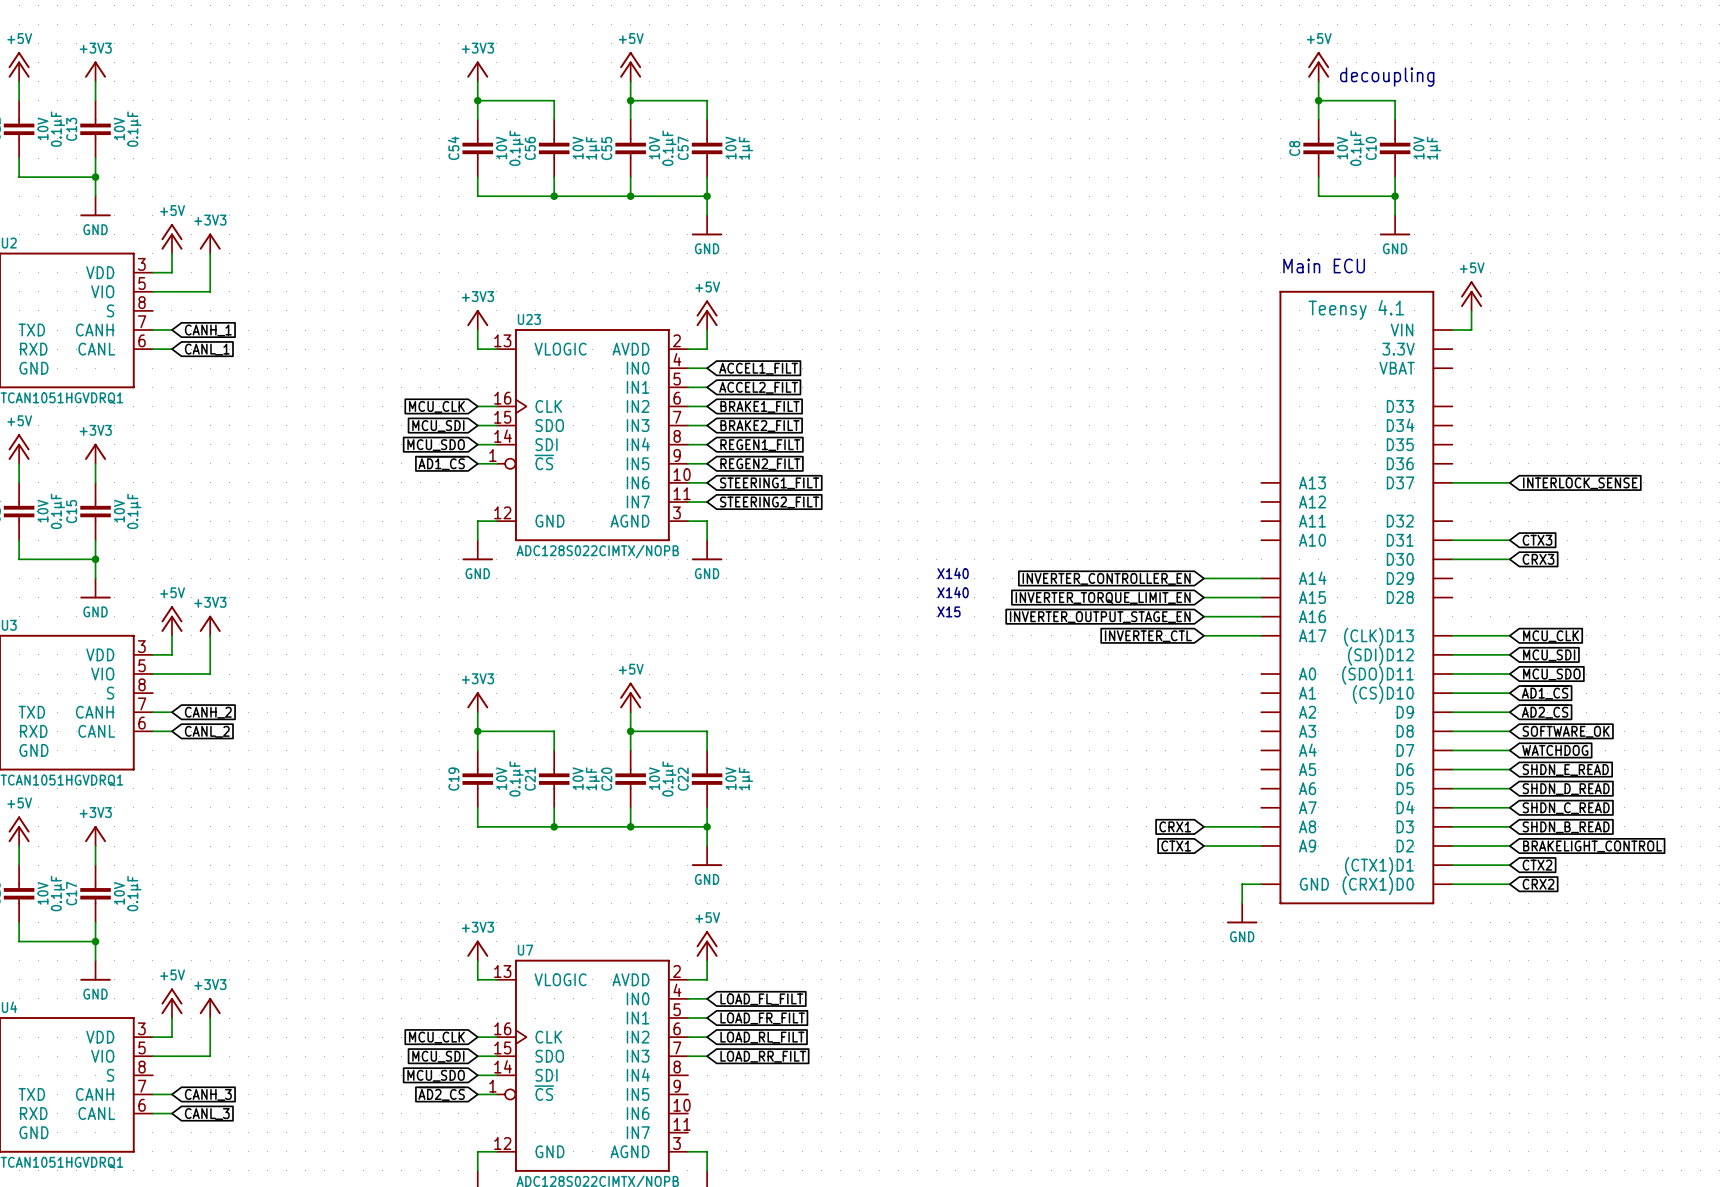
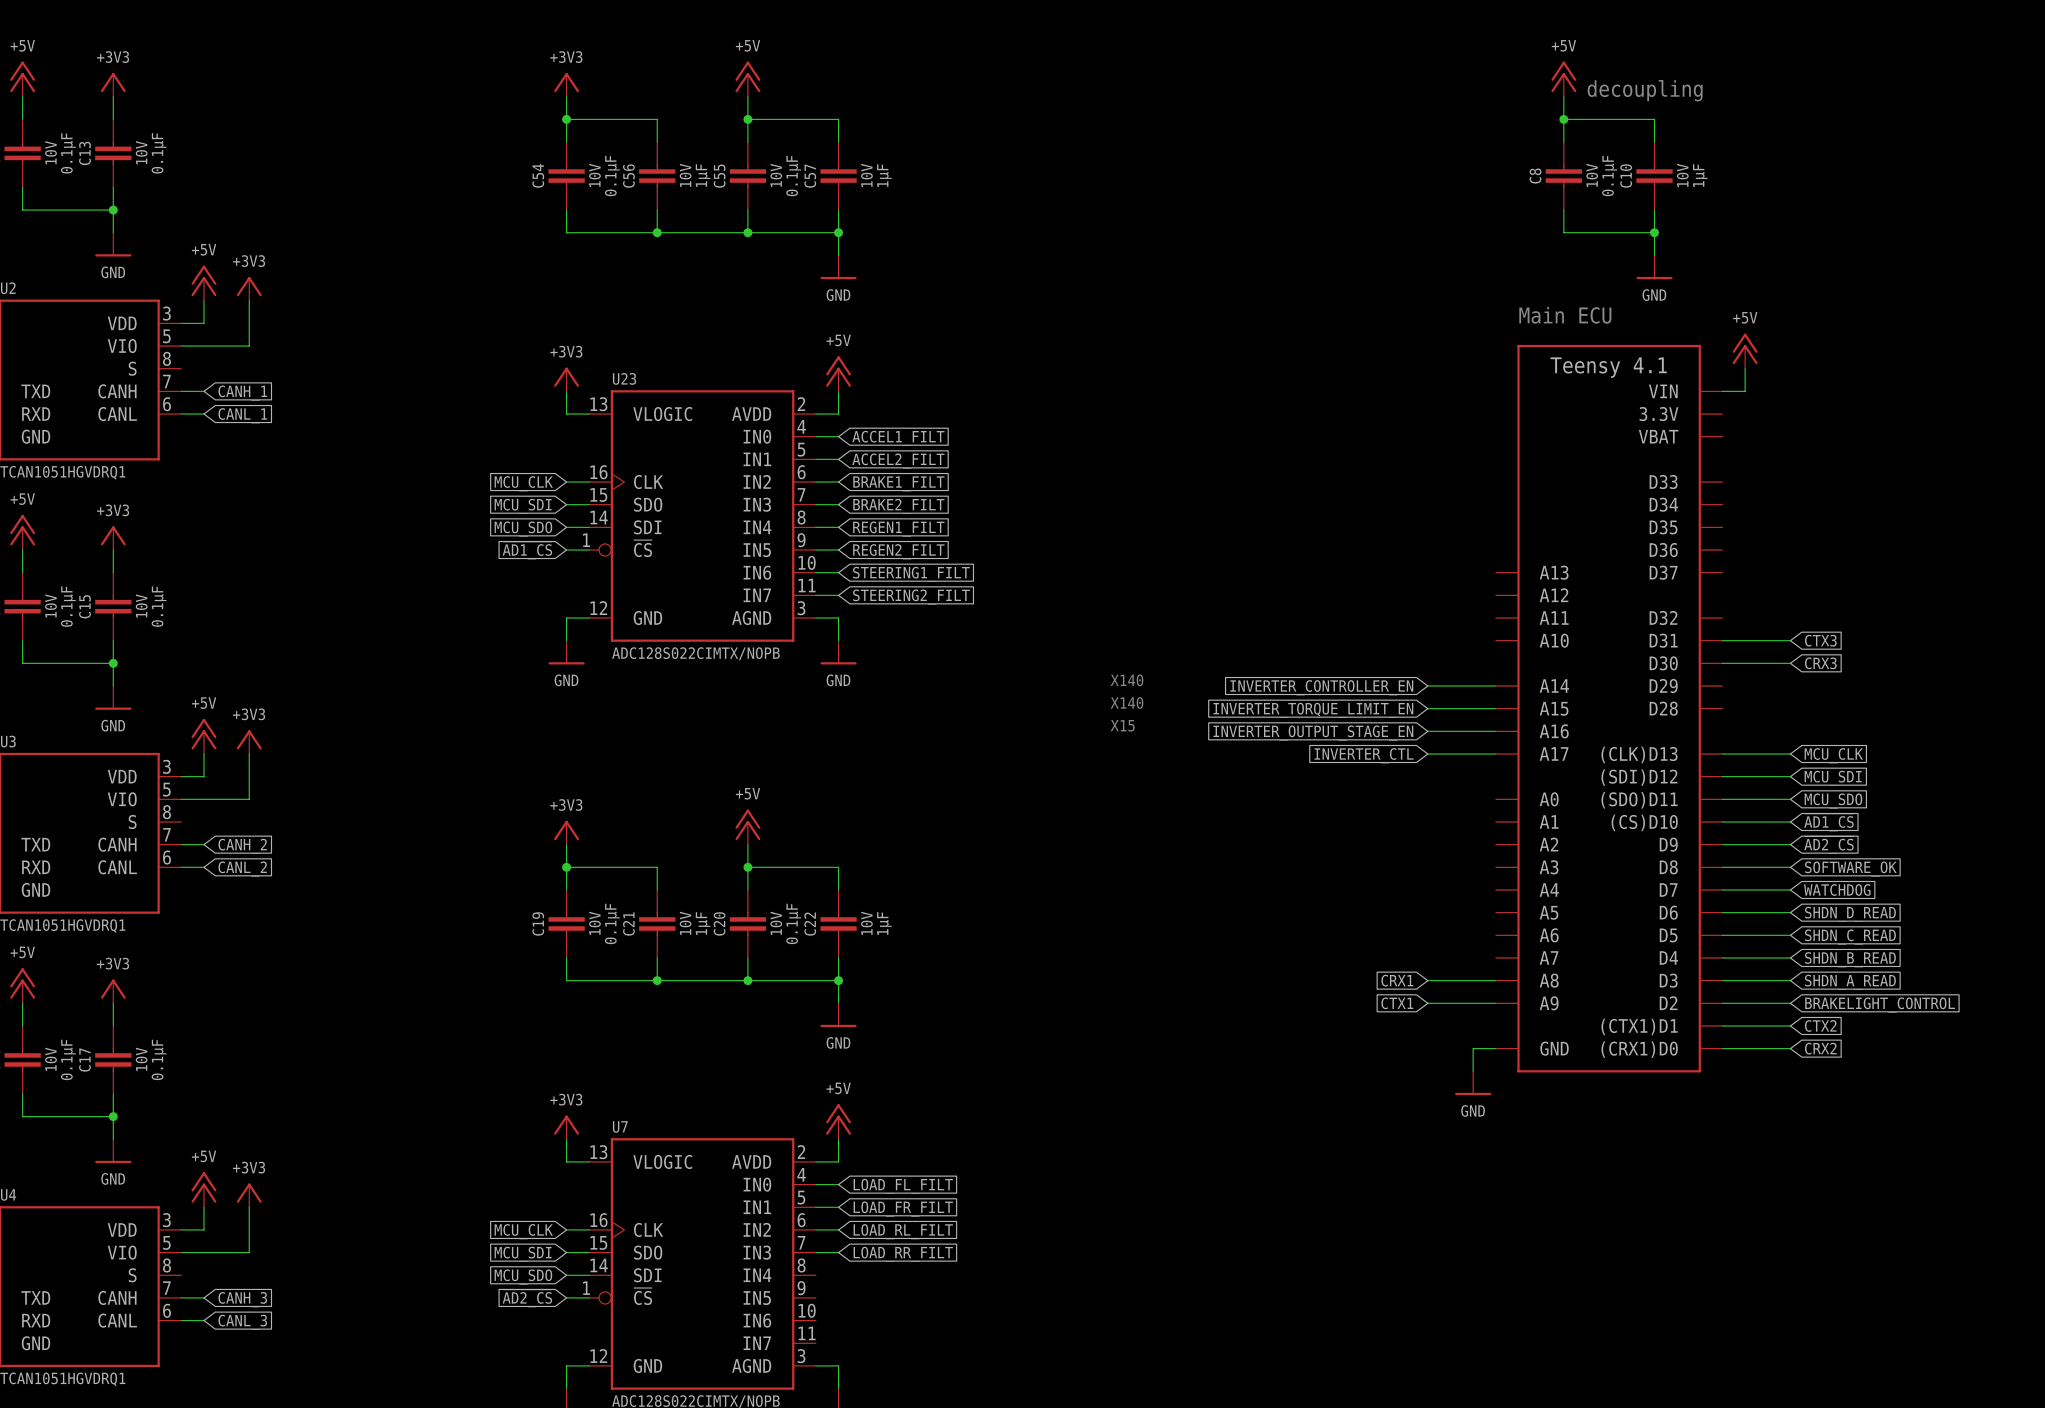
wire: (1452, 482) (1509, 482) -> none
global label: INTERLOCK_SENSE (1580, 483) -> none
global label: SHDN_E_READ (1565, 770) -> SHDN_D_READ (1850, 914)
global label: SHDN_D_READ (1566, 789) -> SHDN_C_READ (1850, 937)
global label: SHDN_C_READ (1566, 808) -> SHDN_B_READ (1850, 959)
global label: SHDN_B_READ (1566, 827) -> SHDN_A_READ (1850, 982)

